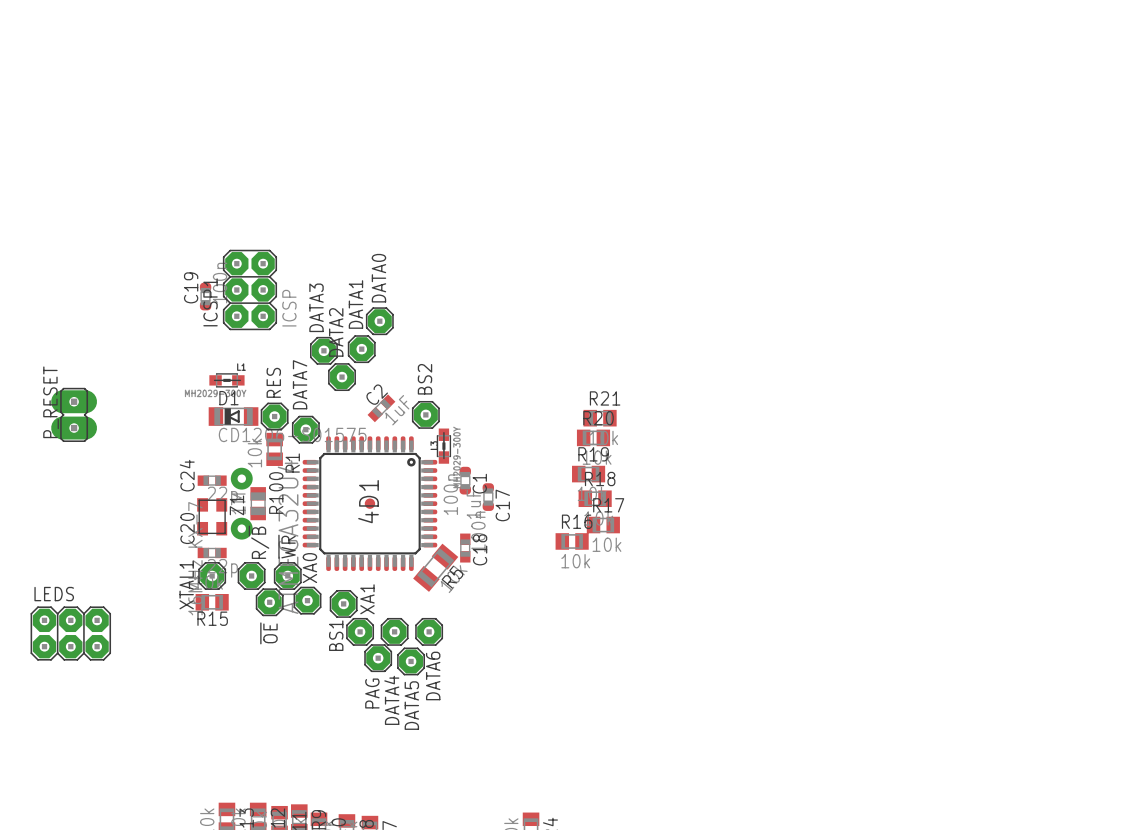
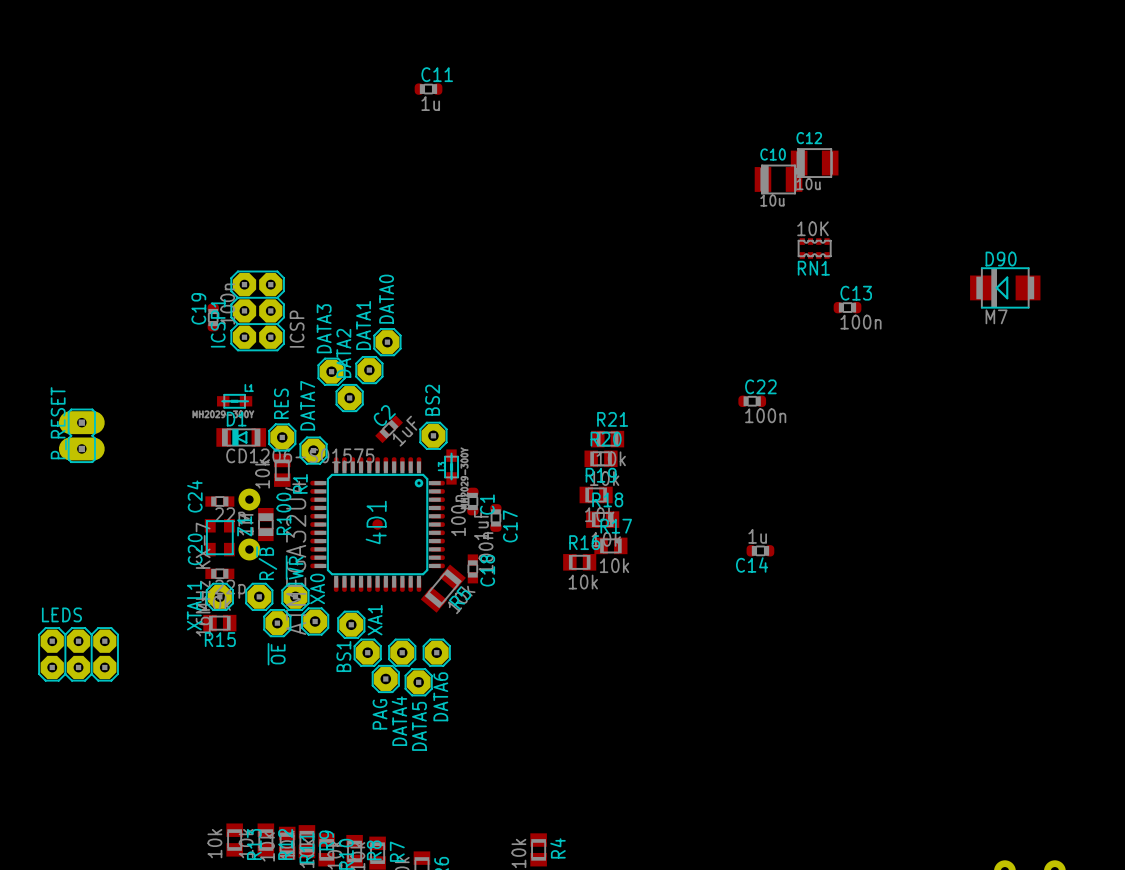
C11: none -> 1u (428, 89)
C12: none -> 10u (814, 163)
C10: none -> 10u (778, 179)
RN1: none -> 10K (814, 248)
D90: none -> M7 (1005, 287)
C13: none -> 100n (847, 307)
C22: none -> 100n (752, 401)
C14: none -> 1u (760, 550)

